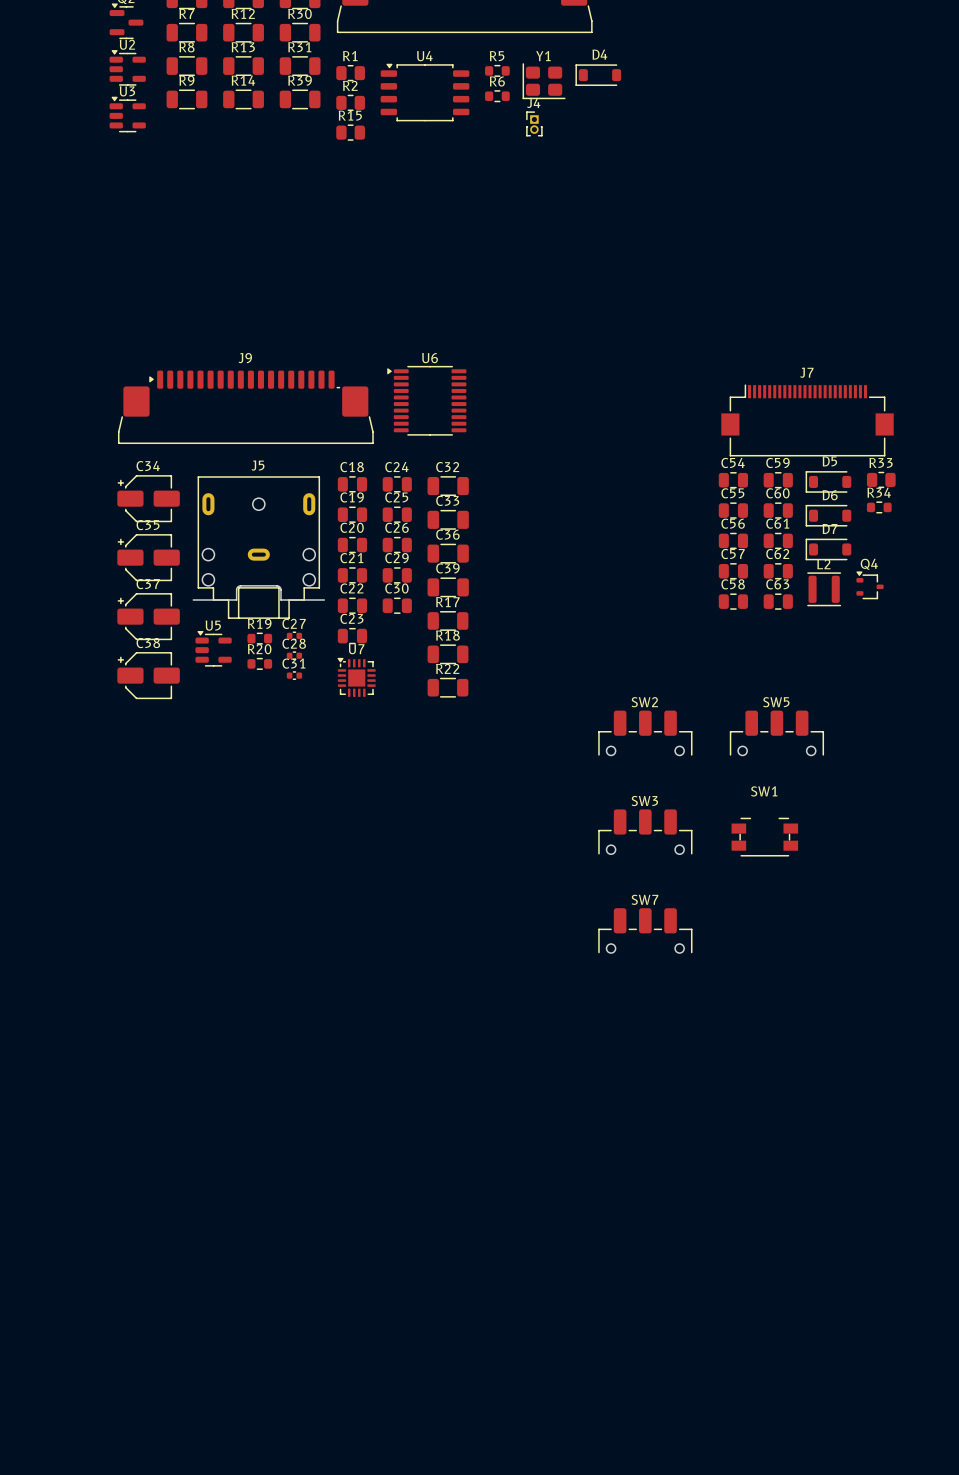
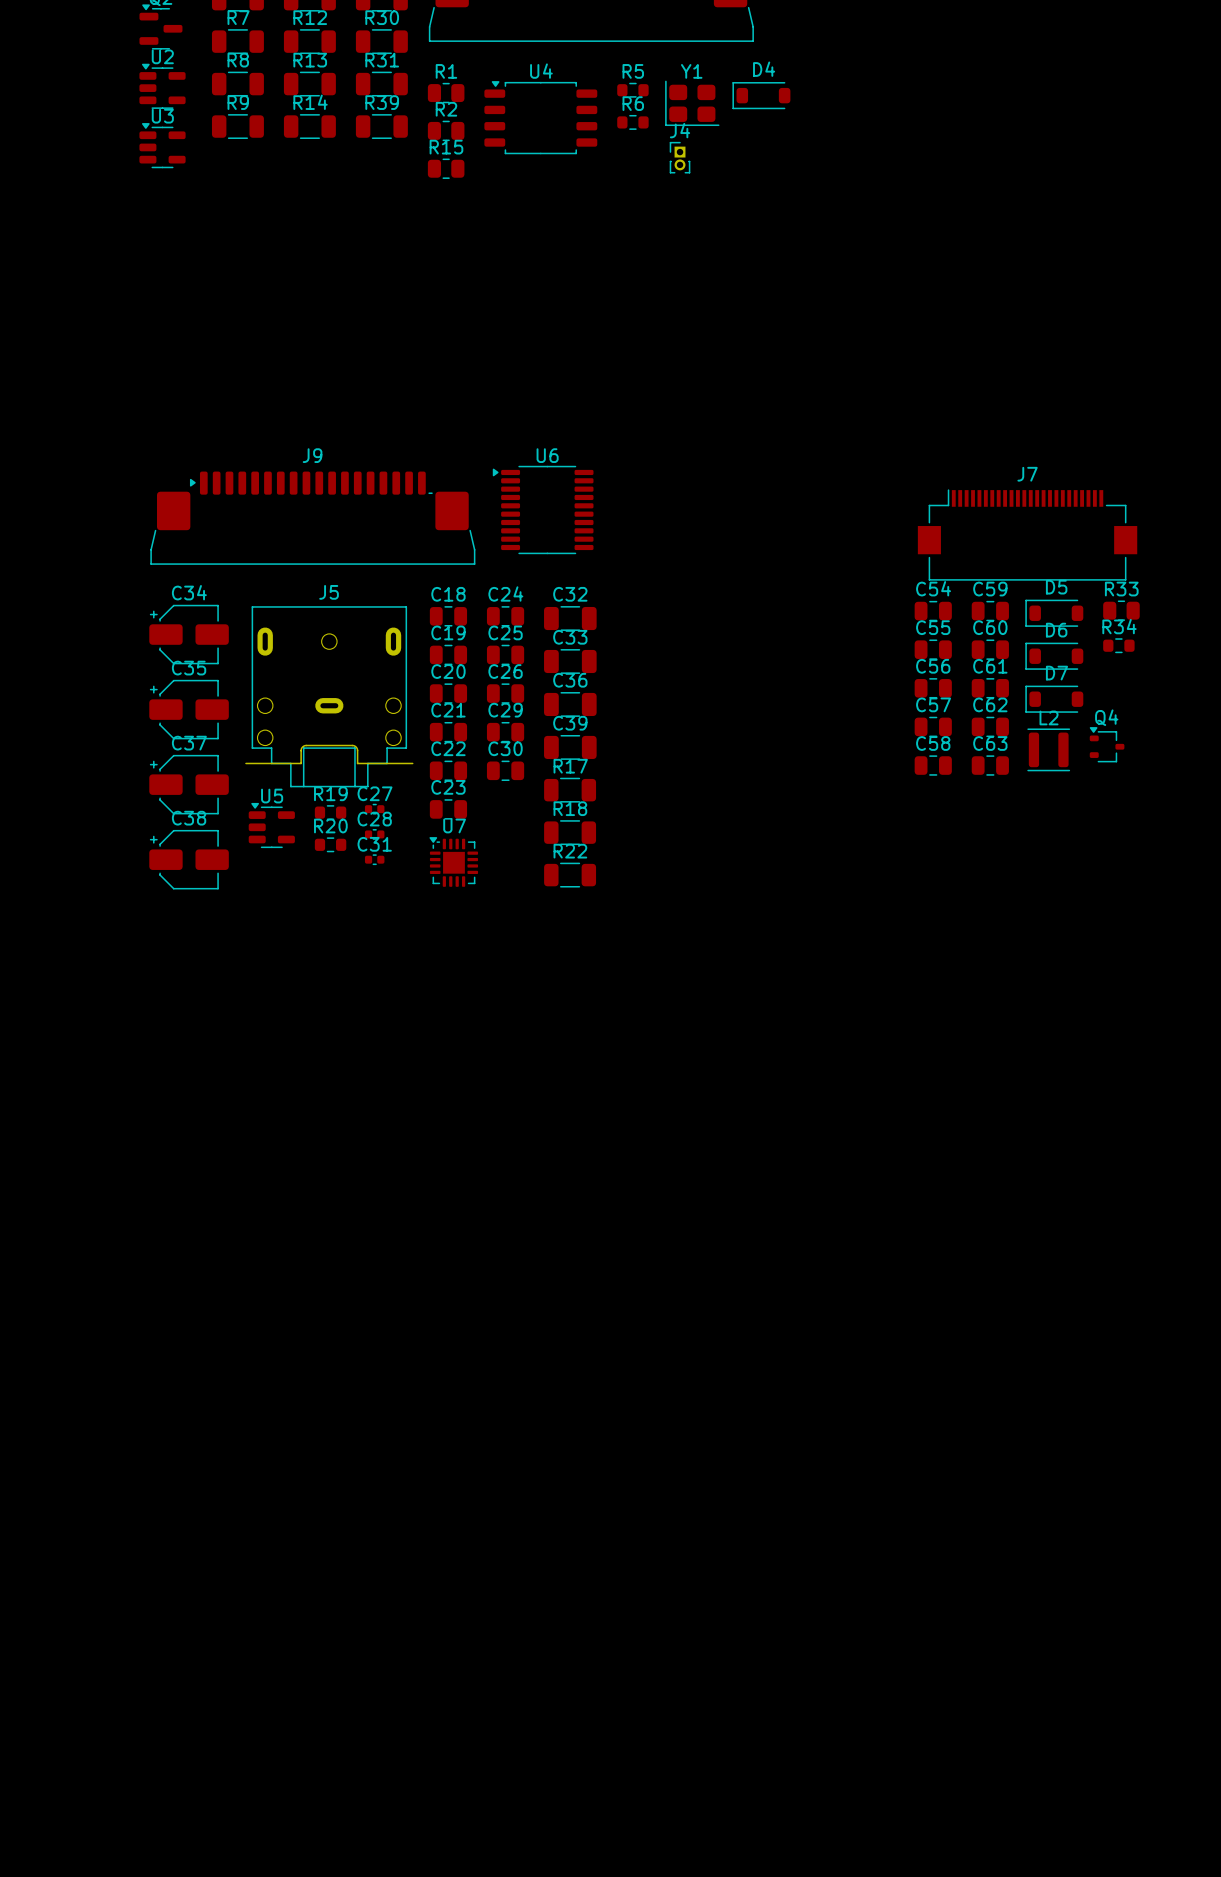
SW2: (645, 733) -> none
SW5: (776, 733) -> none
SW3: (645, 831) -> none
SW1: (764, 837) -> none
SW7: (645, 930) -> none

